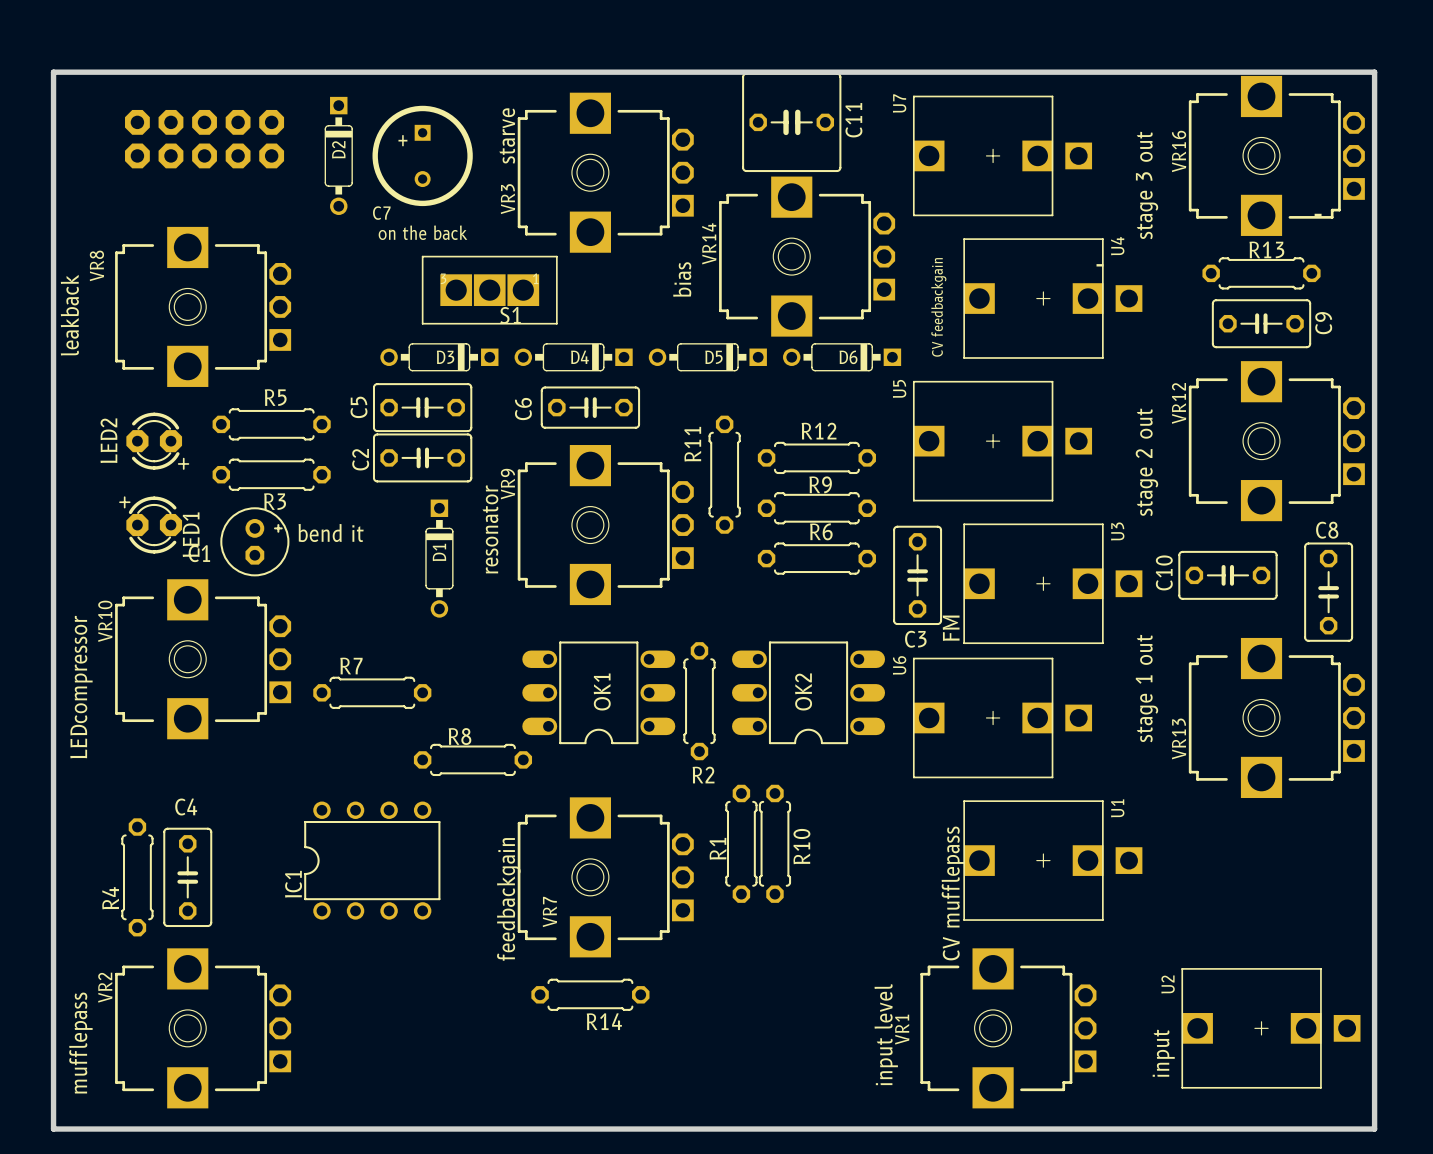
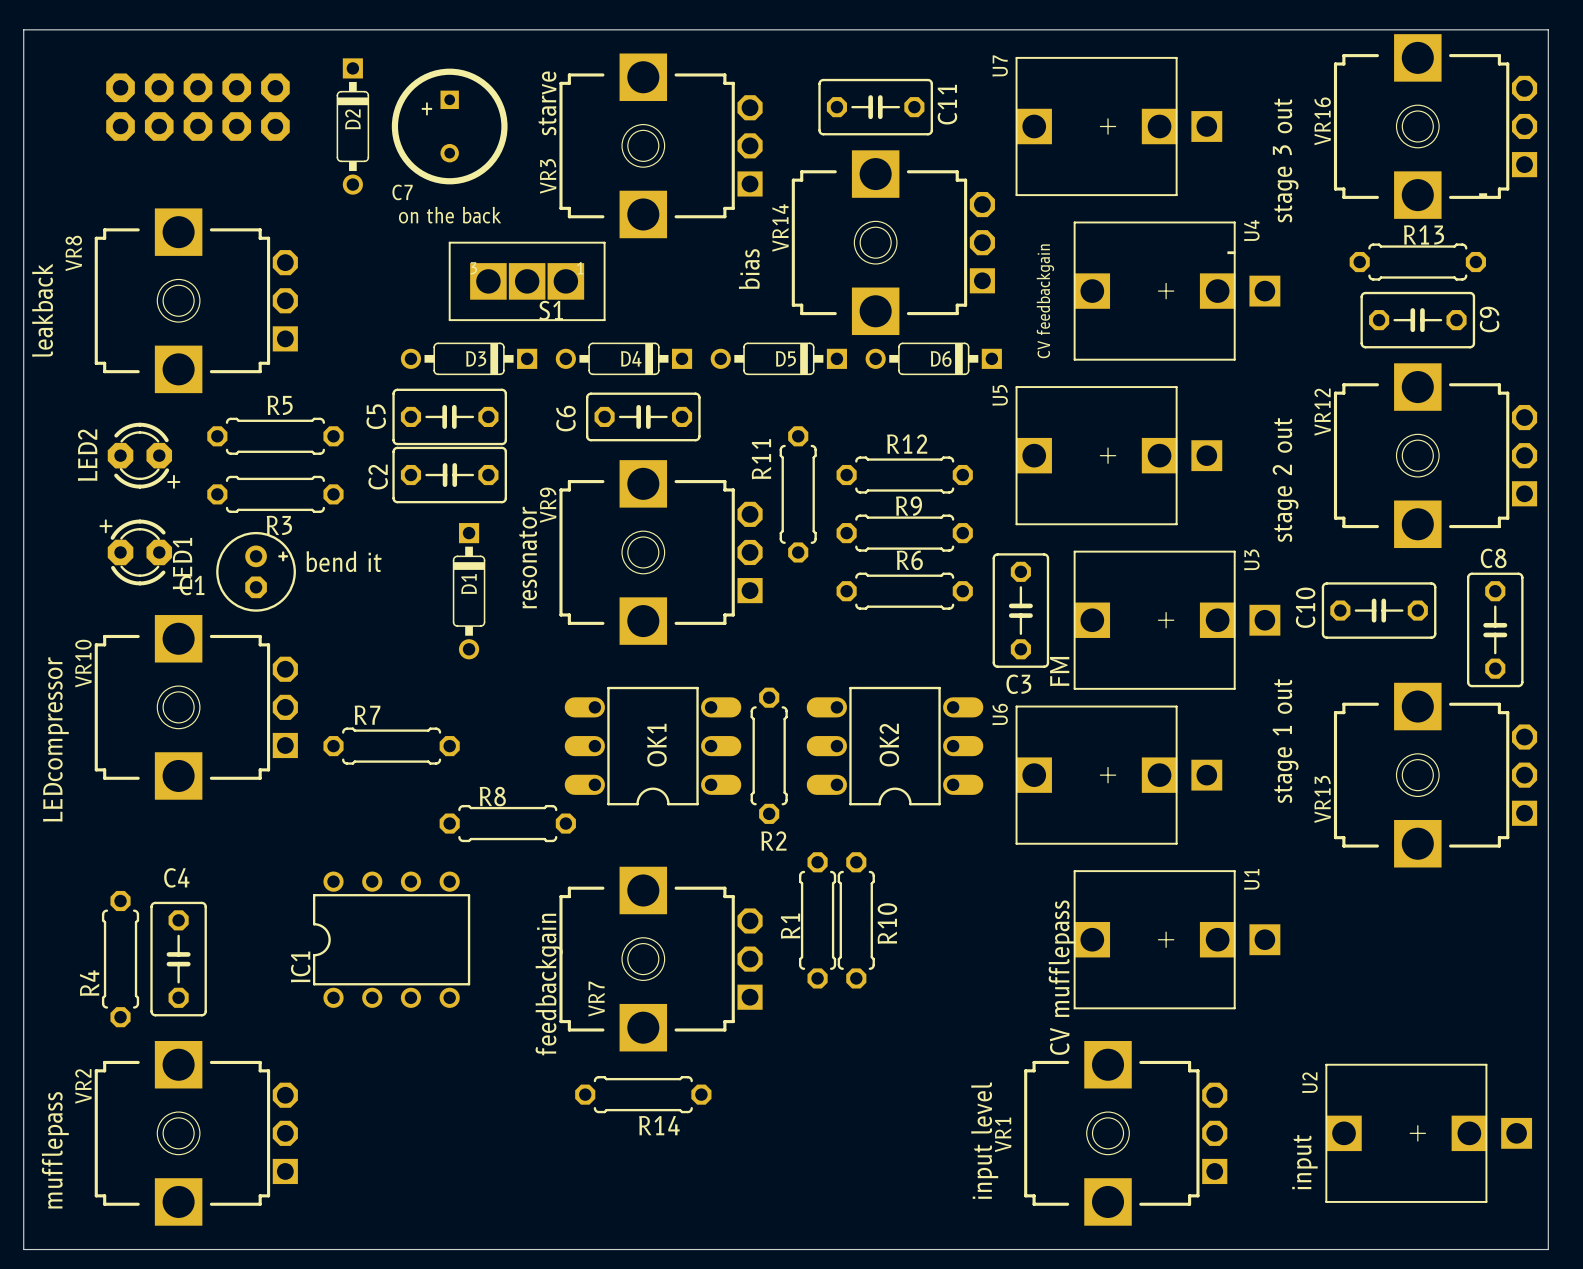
board edge width: thick (53, 72) (1374, 72) (1374, 1129) (53, 1129) (53, 72) -> thin (23, 29) (1548, 29) (1548, 1249) (23, 1249) (23, 29)
C11 footprint: [742, 72, 842, 173] -> [818, 78, 933, 136]

